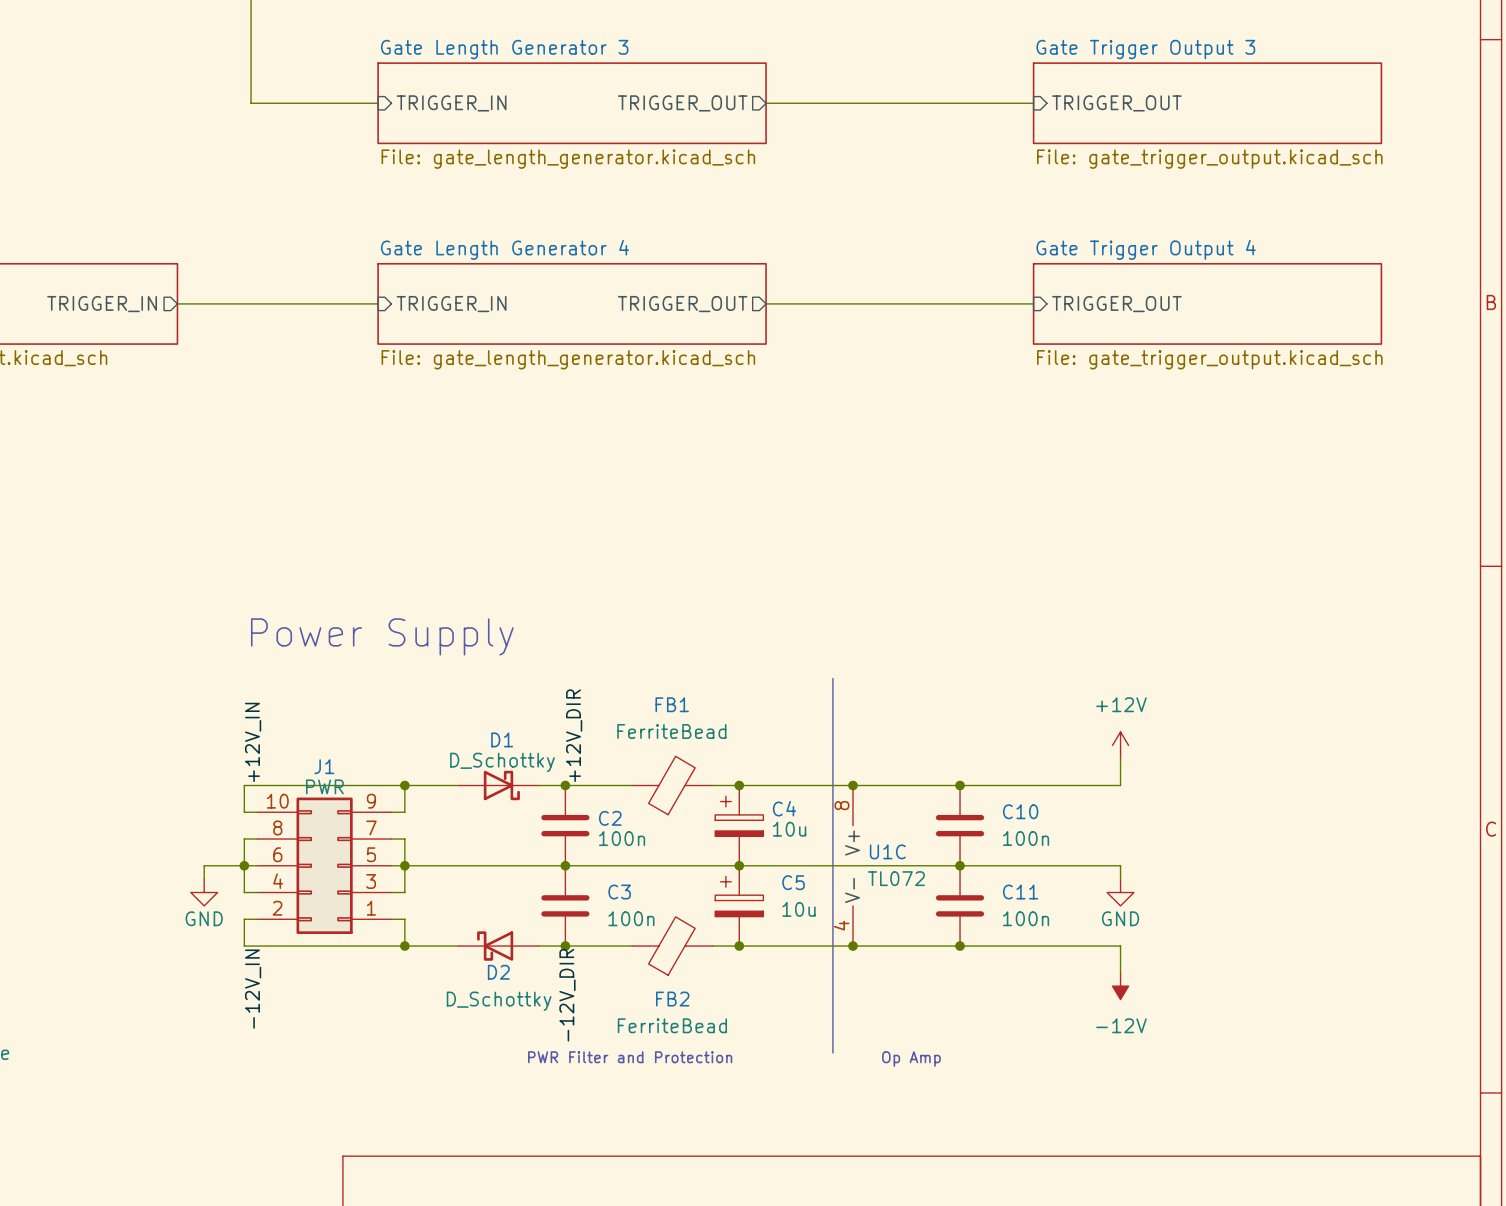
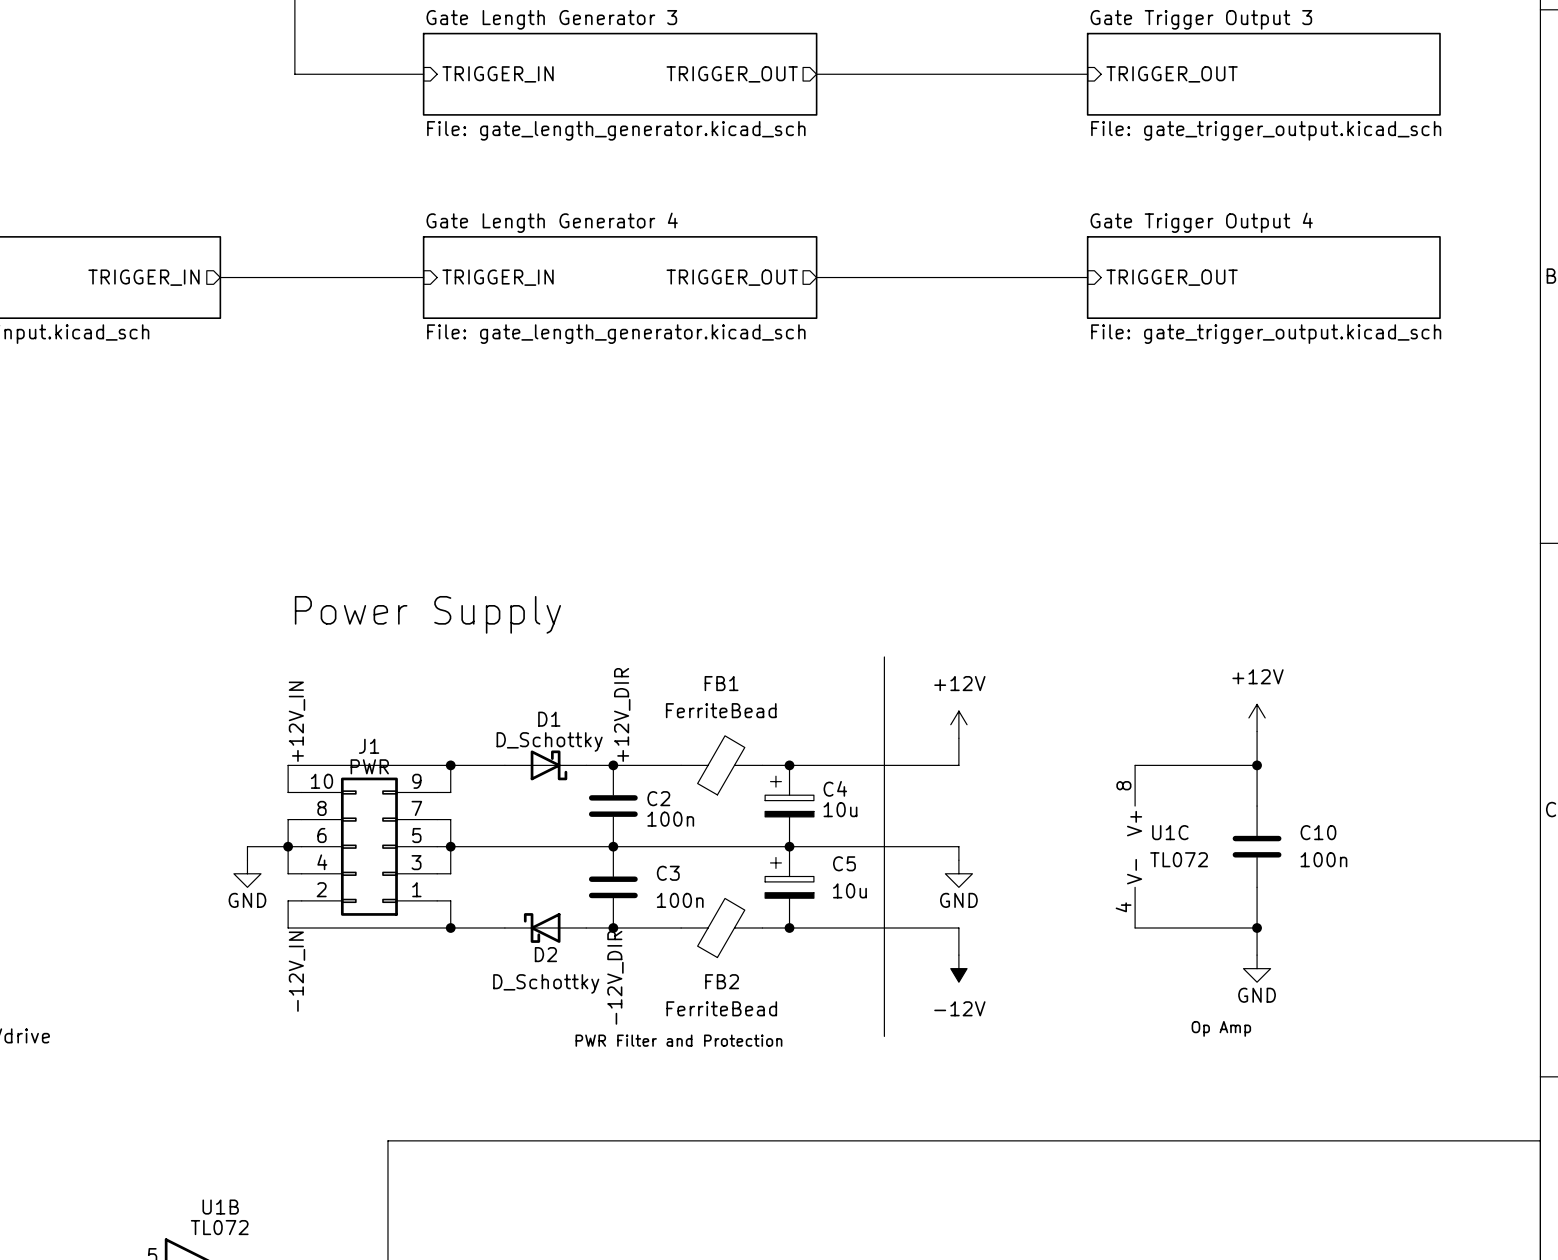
power symbol: none -> +12V (958, 724)
power symbol position: +12V (1120, 745) -> +12V (1257, 717)
wire: none -> (1257, 731) (1257, 806)
wire: (1120, 758) (1120, 785) -> (1257, 765) (1175, 765)
junction: (853, 785) -> none
wire: (906, 785) (1080, 785) -> (958, 765) (958, 738)
junction: (960, 785) -> none
junction: none -> (1257, 765)
C10 position: (960, 825) -> (1257, 846)
U1C position: (853, 865) -> (1135, 846)
wire: (906, 865) (1120, 865) (1120, 879) -> (958, 846) (958, 860)
junction: (960, 865) -> none
power symbol: none -> GND (958, 873)
power symbol: GND (1120, 892) -> none
C11: 100n (960, 905) -> none
wire: none -> (1257, 887) (1257, 955)
junction: (853, 946) -> none
wire: (906, 946) (1080, 946) -> (958, 928) (958, 955)
junction: (960, 946) -> none
wire: (1120, 946) (1120, 972) -> (1175, 928) (1257, 928)
junction: none -> (1257, 928)
power symbol position: -12V (1120, 986) -> -12V (958, 968)
power symbol: none -> GND (1257, 968)
text position: Op Amp (911, 1058) -> Op Amp (1221, 1028)

